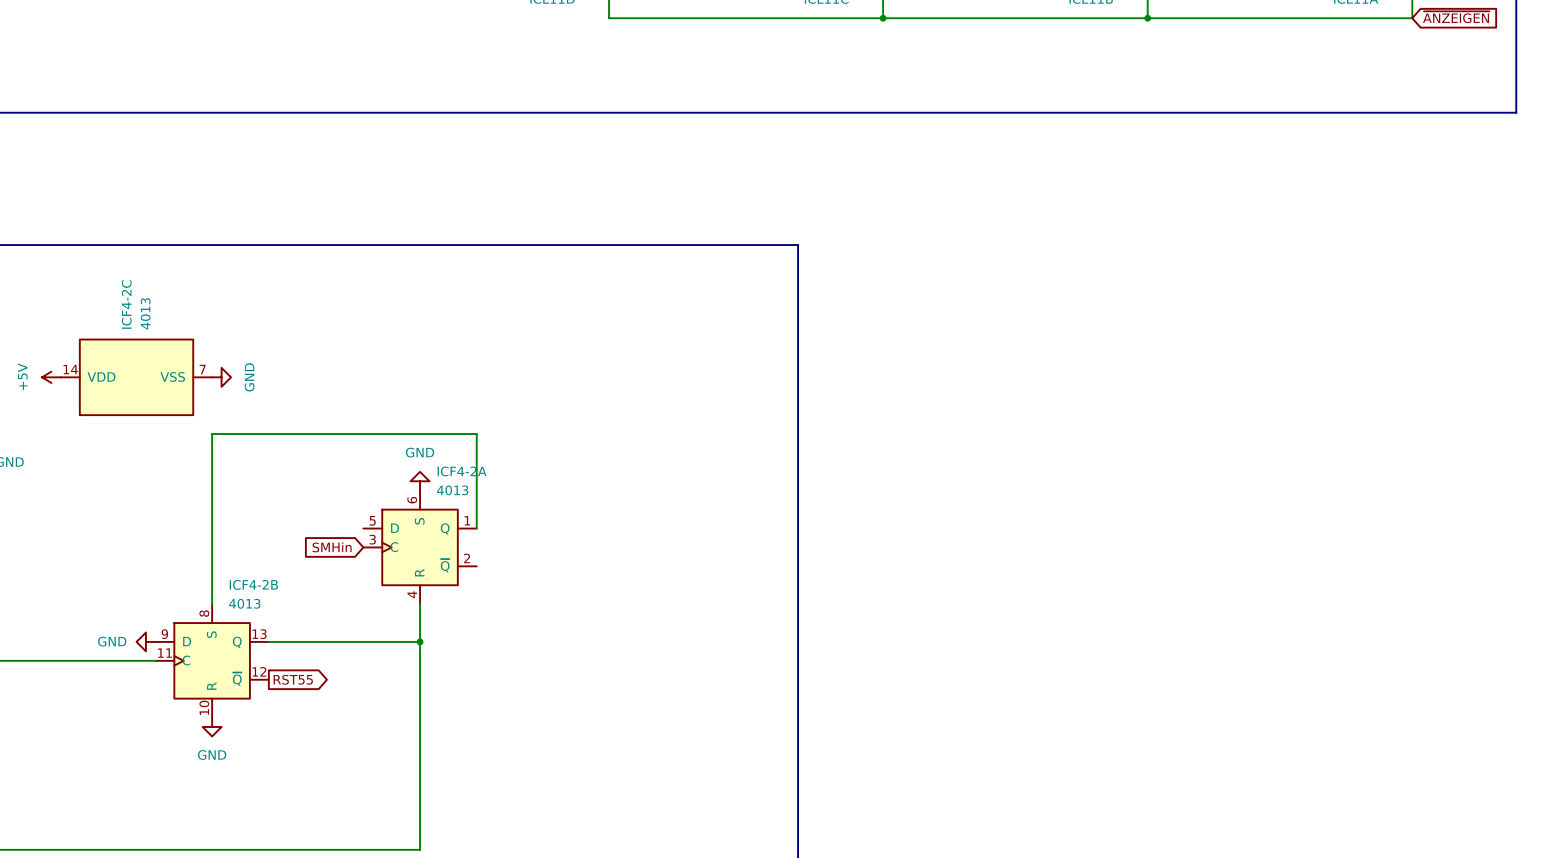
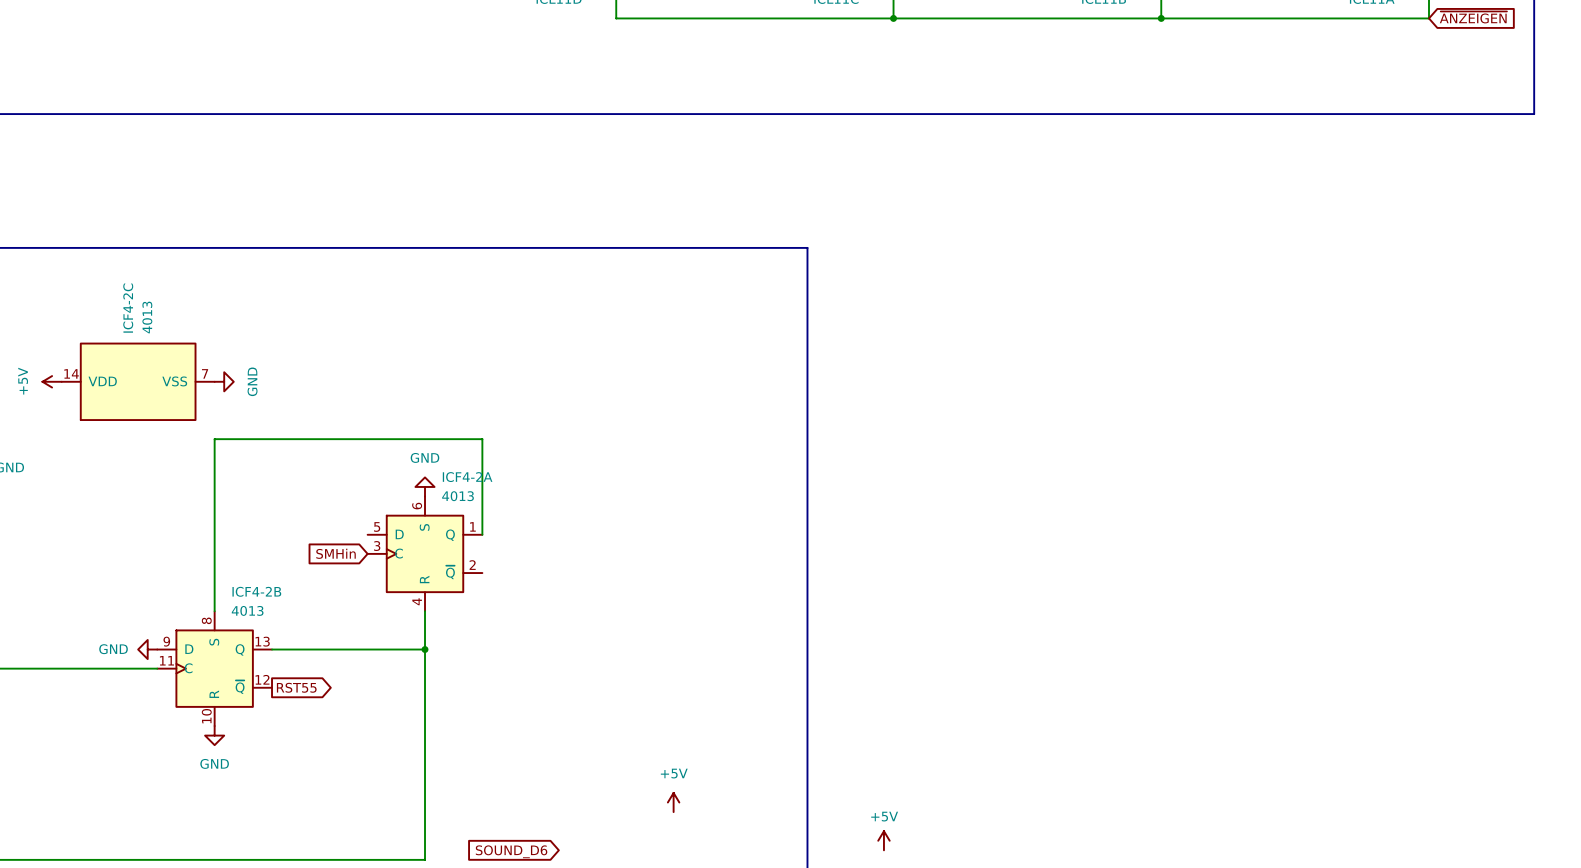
power symbol: none -> +5V (673, 802)
power symbol: none -> +5V (883, 840)
global label: none -> SOUND_D6 (511, 851)

